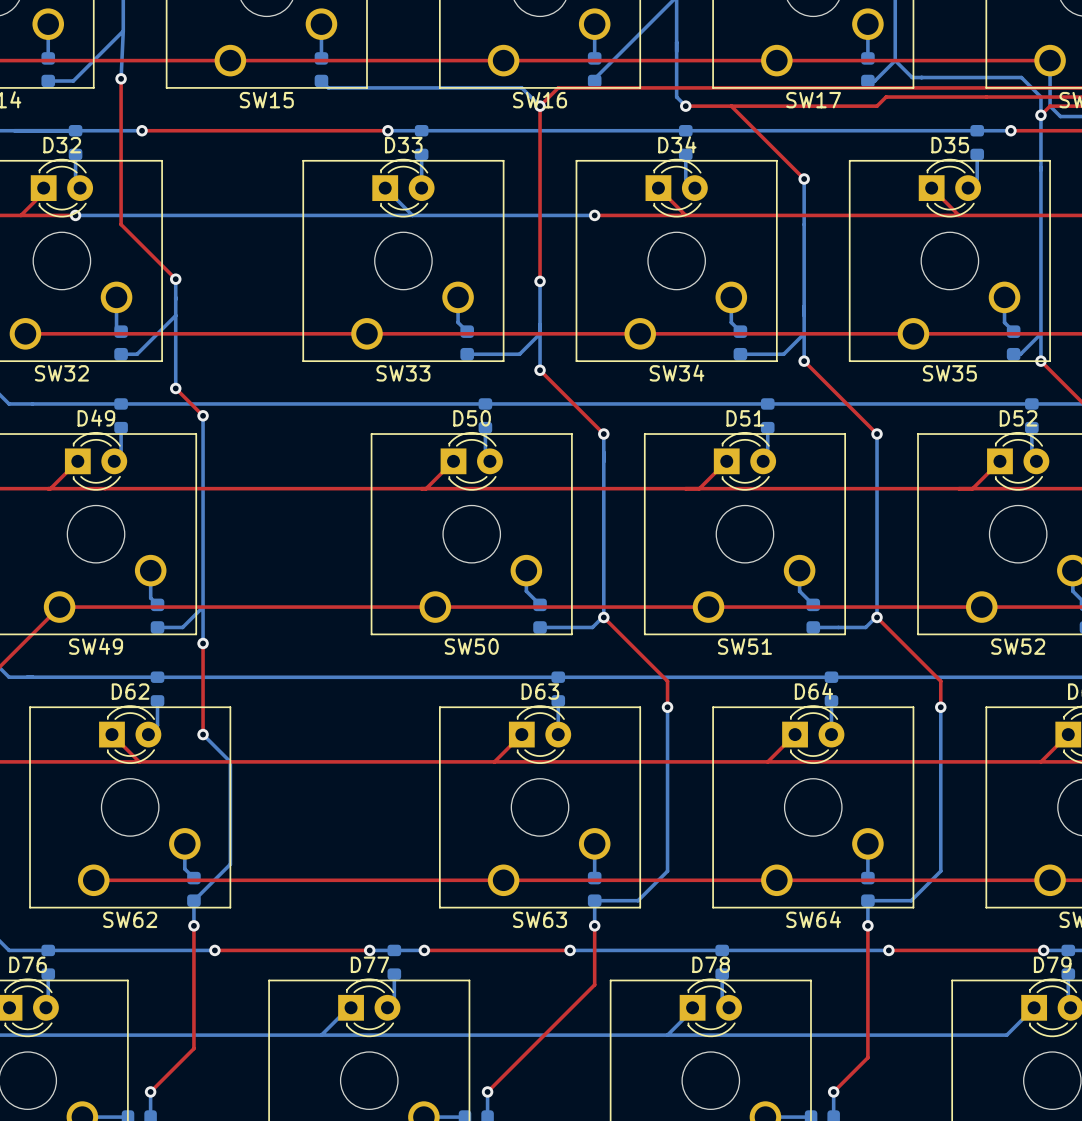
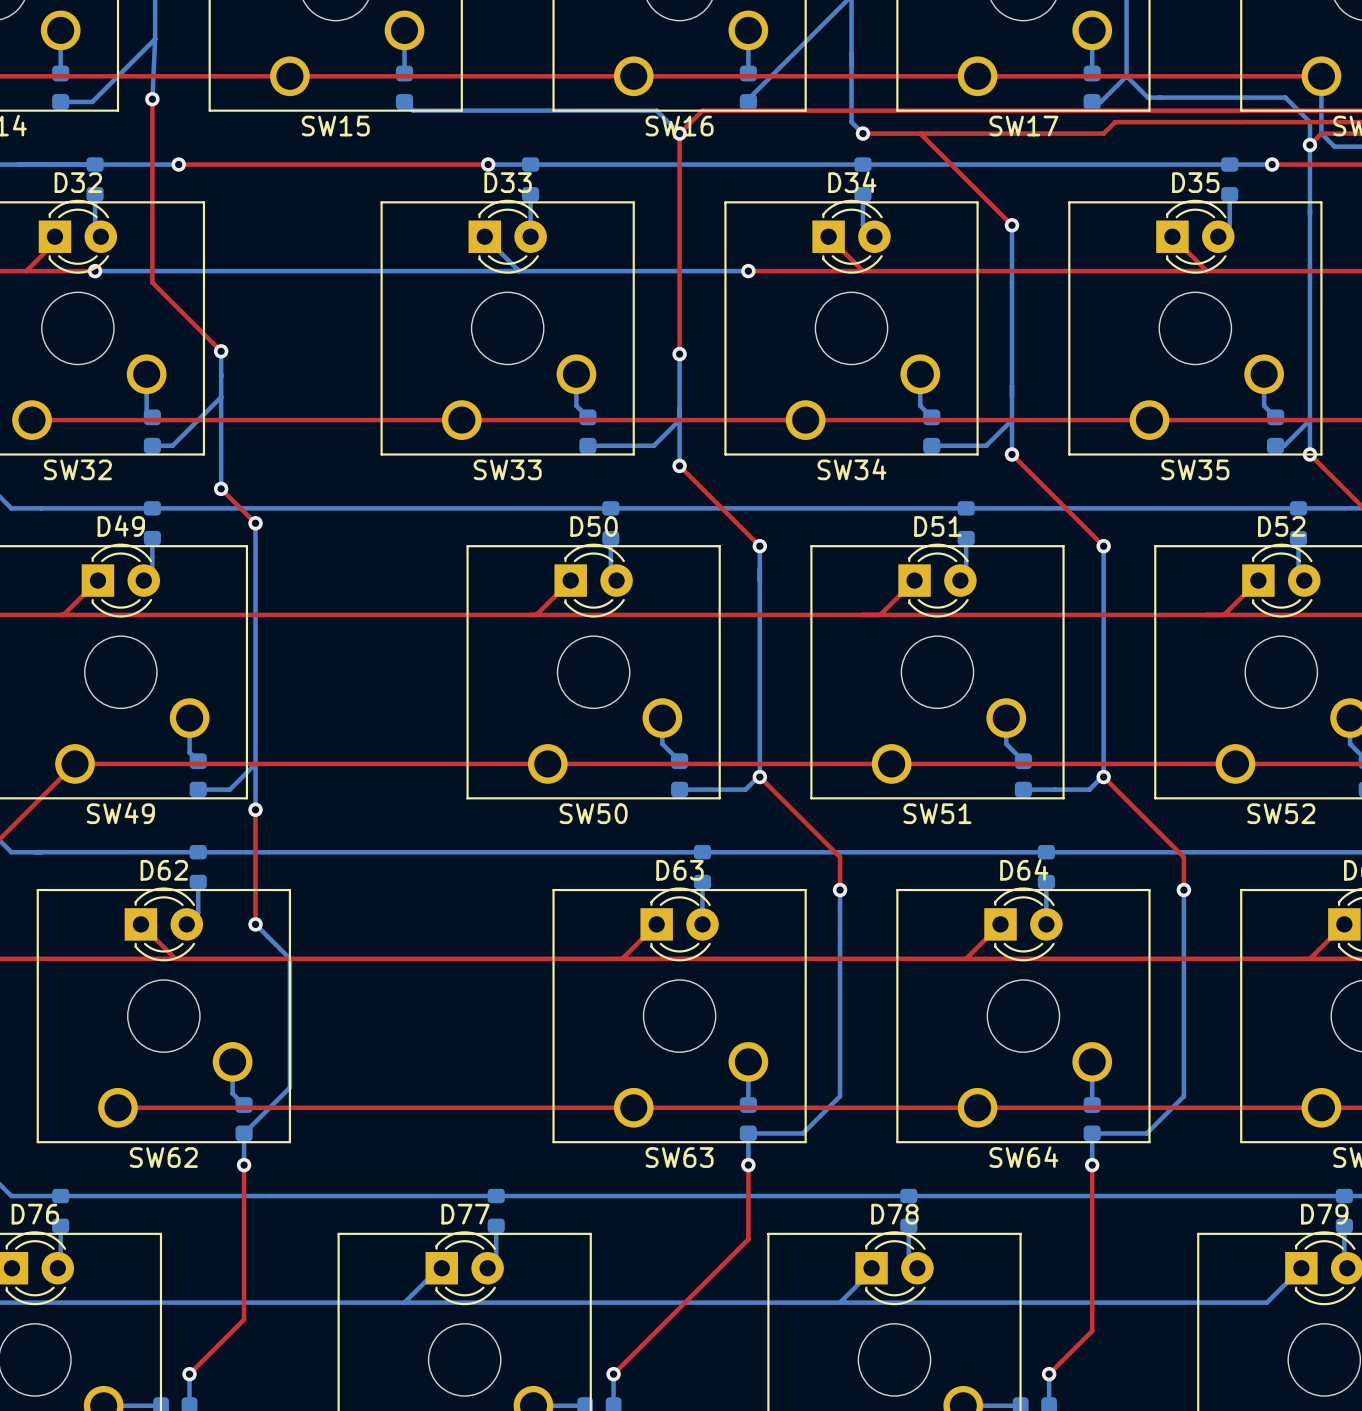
top track: (214, 950) (369, 950) -> none
bottom track: none -> (270, 1196) (465, 1196)
via: (214, 950) -> none
via: (369, 950) -> none
top track: (424, 950) (570, 950) -> none
bottom track: none -> (534, 1196) (717, 1196)
via: (424, 950) -> none
via: (570, 950) -> none
top track: (888, 950) (1043, 950) -> none
bottom track: none -> (1118, 1196) (1313, 1196)
via: (888, 950) -> none
via: (1043, 950) -> none

